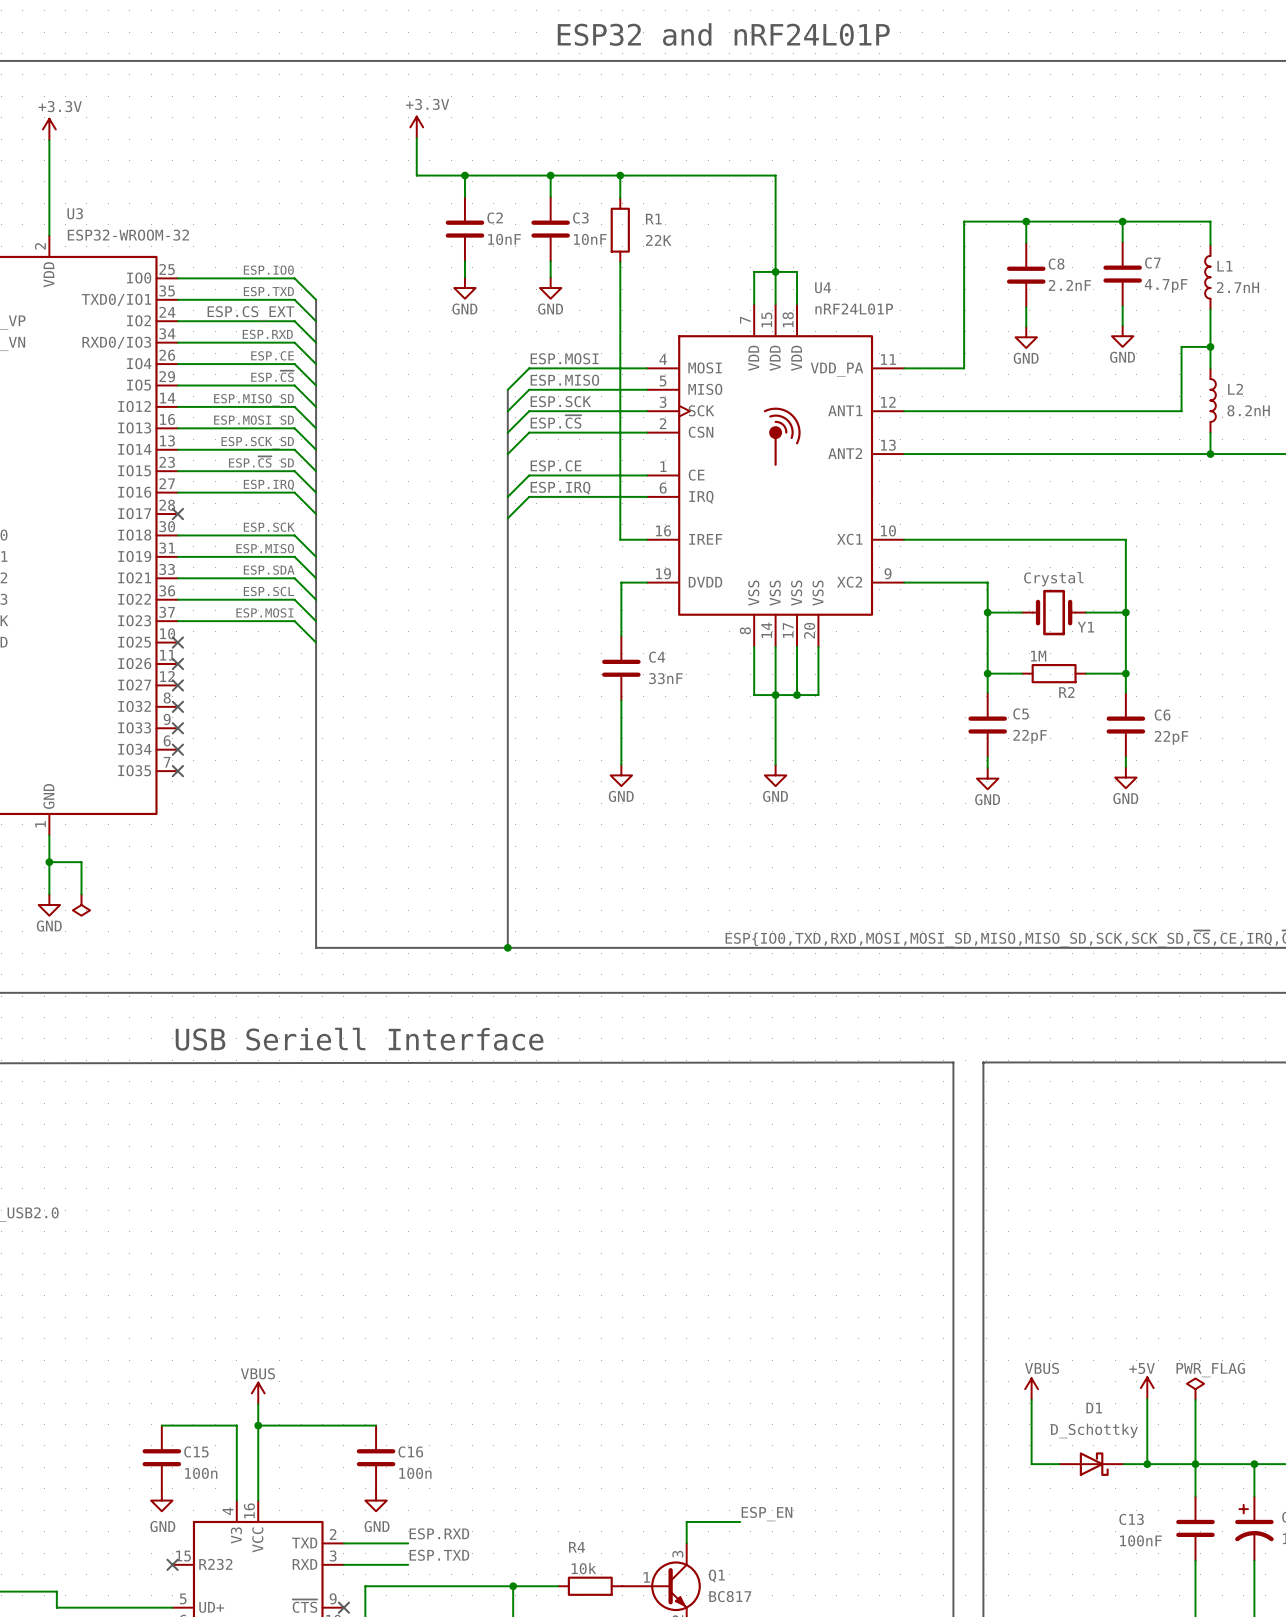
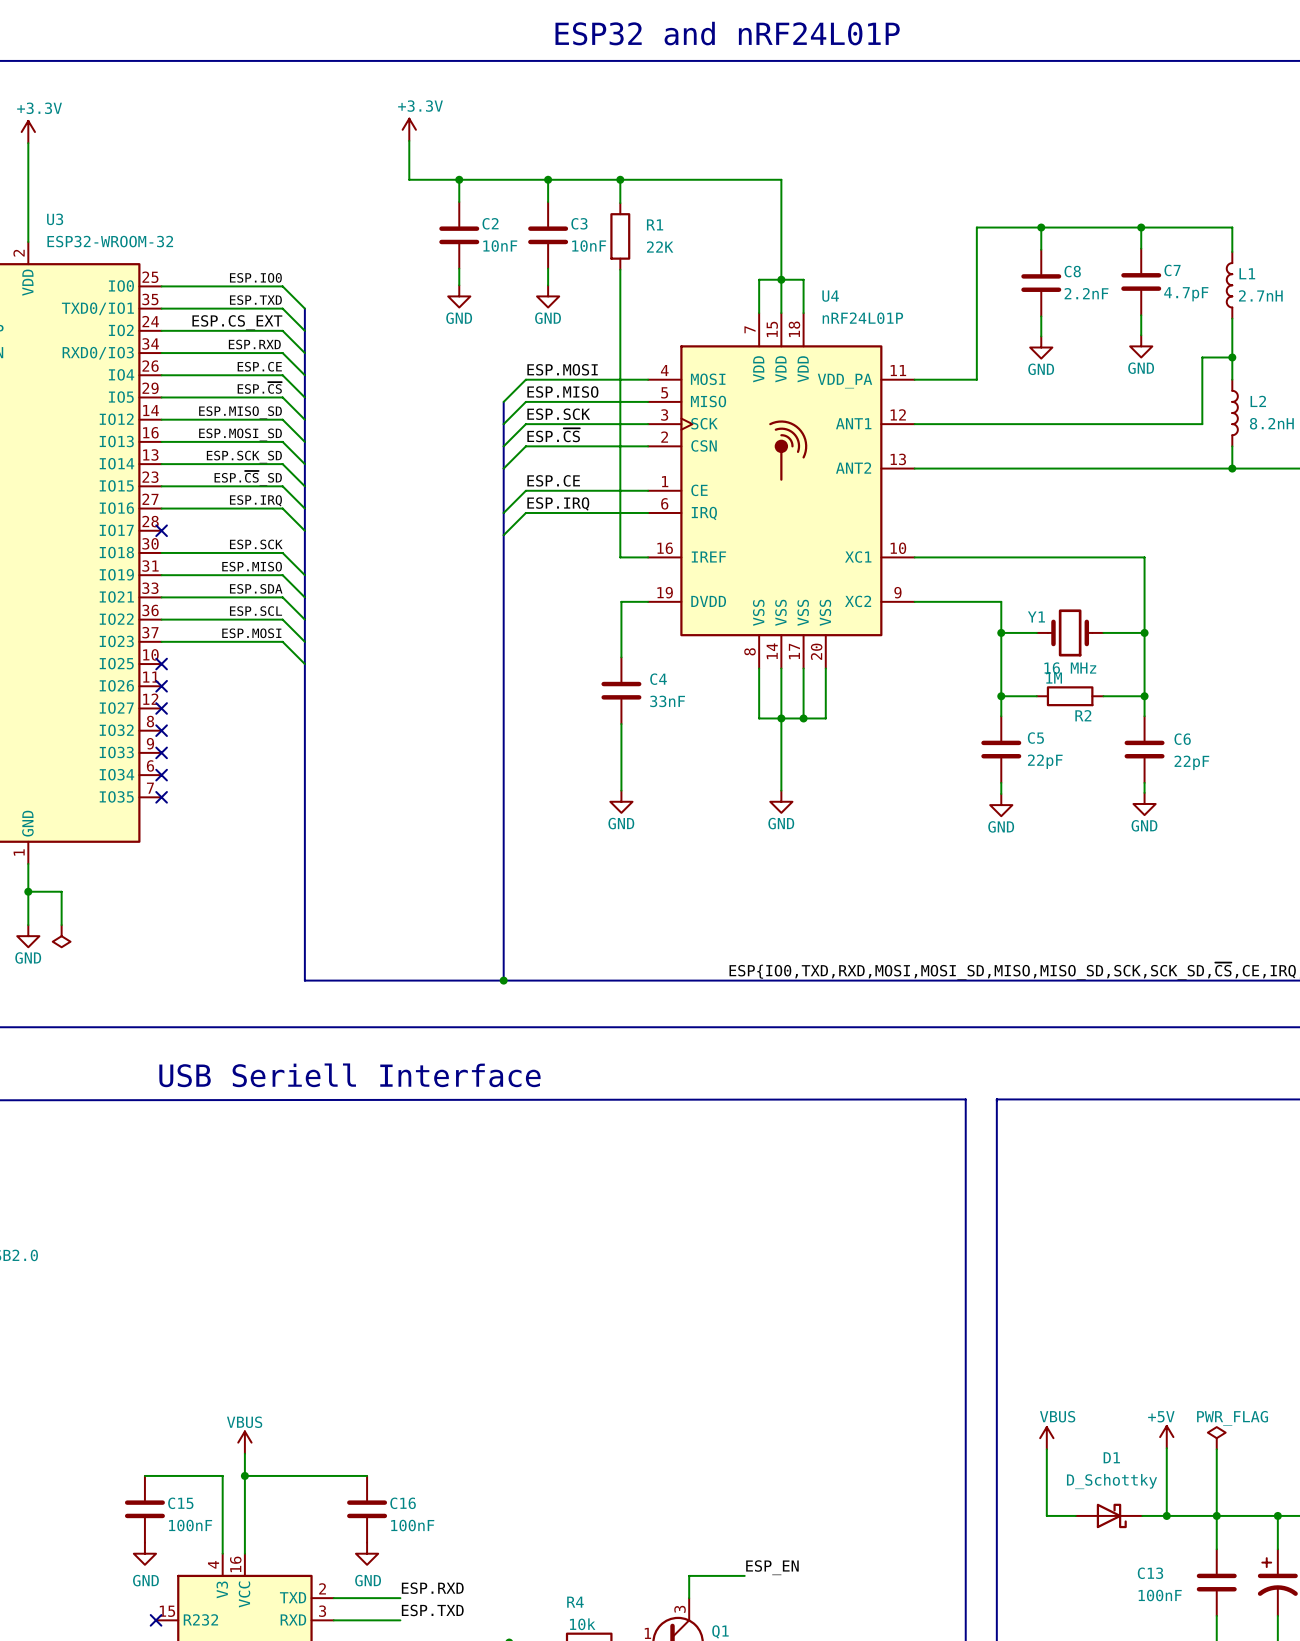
Y1 value: Crystal (1053, 579) -> 16 MHz (1070, 668)
Y1 name position: Y1 (1085, 627) -> Y1 (1036, 616)
C15 value: 100n (201, 1473) -> 100nF (190, 1525)
C16 value: 100n (415, 1473) -> 100nF (412, 1525)

